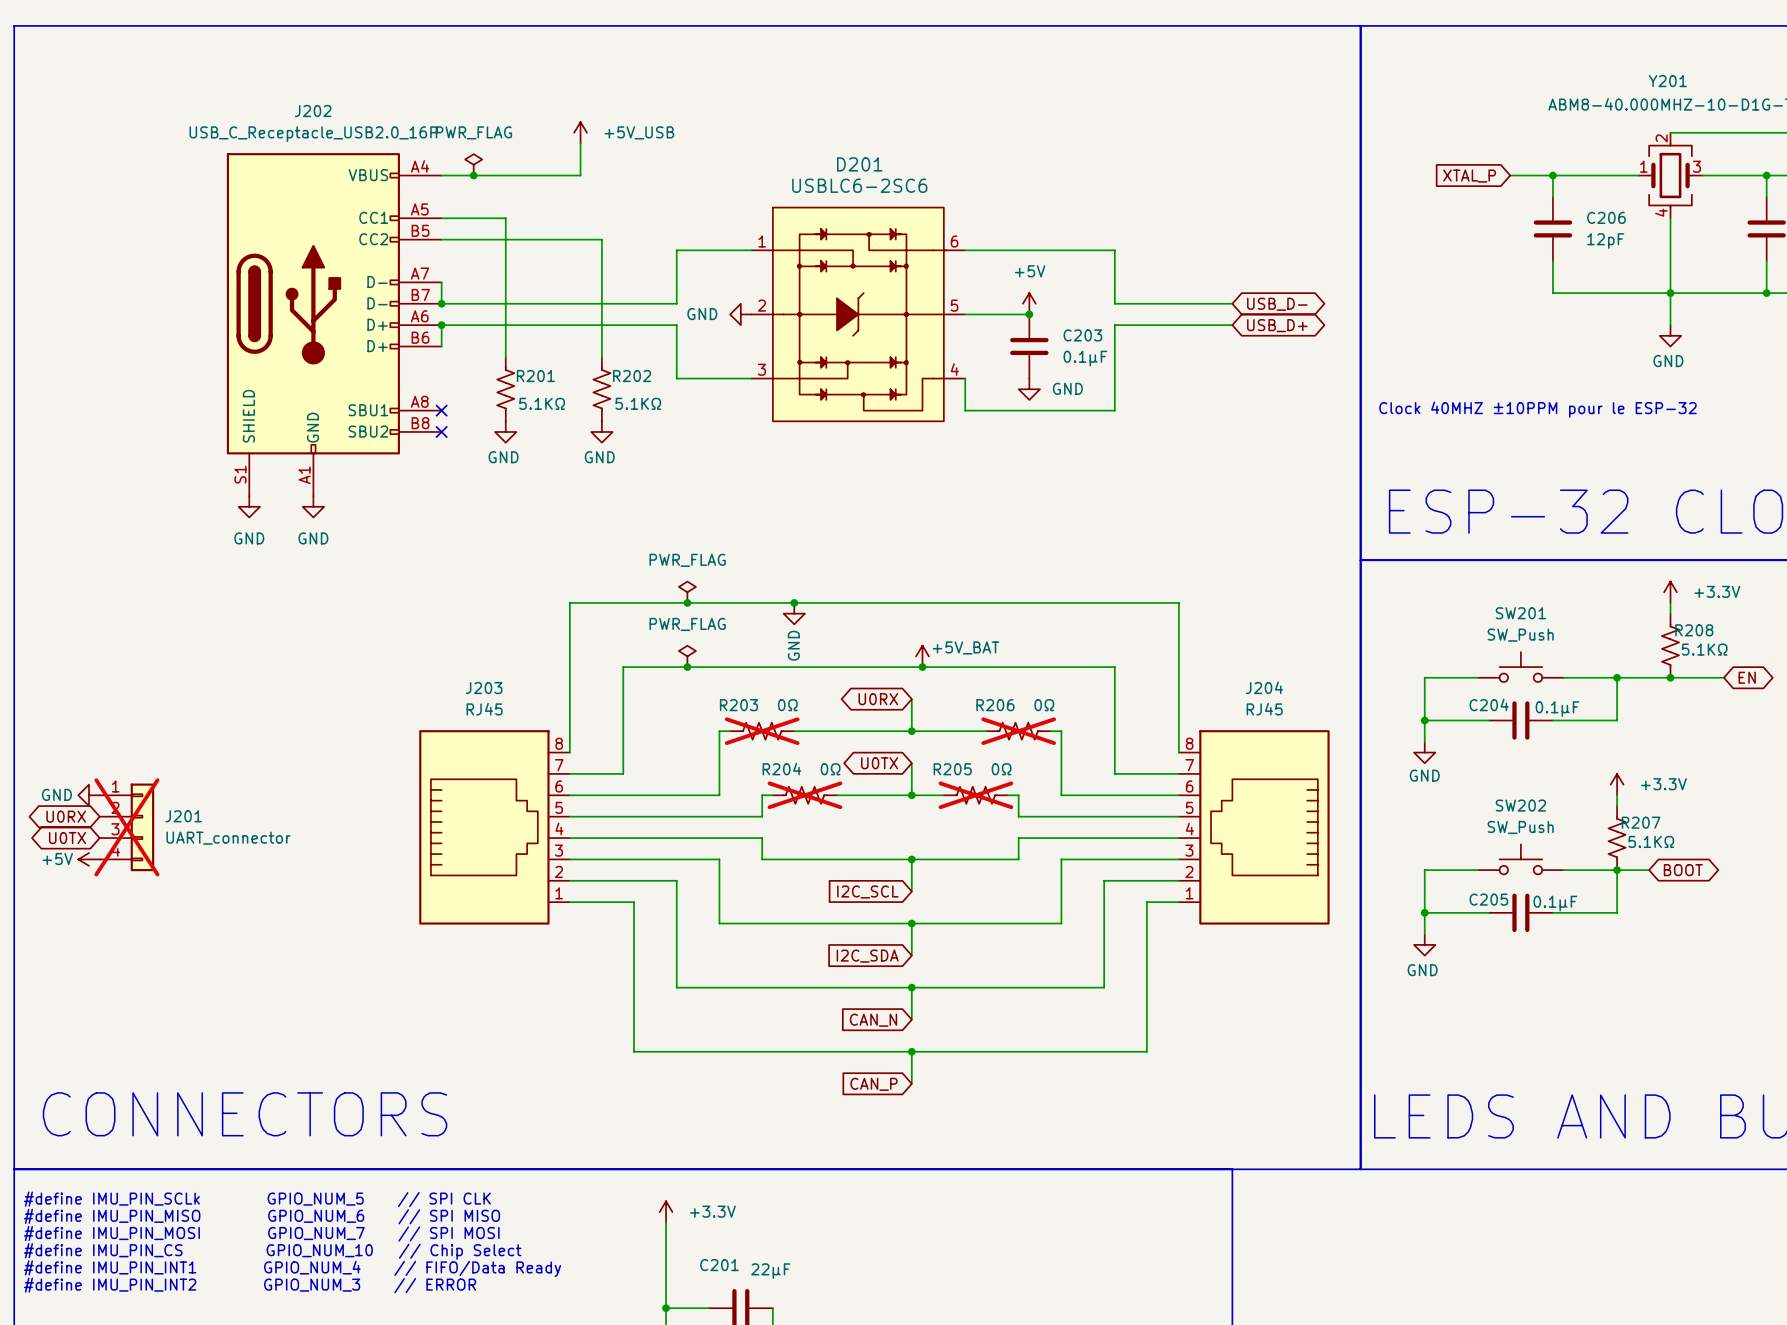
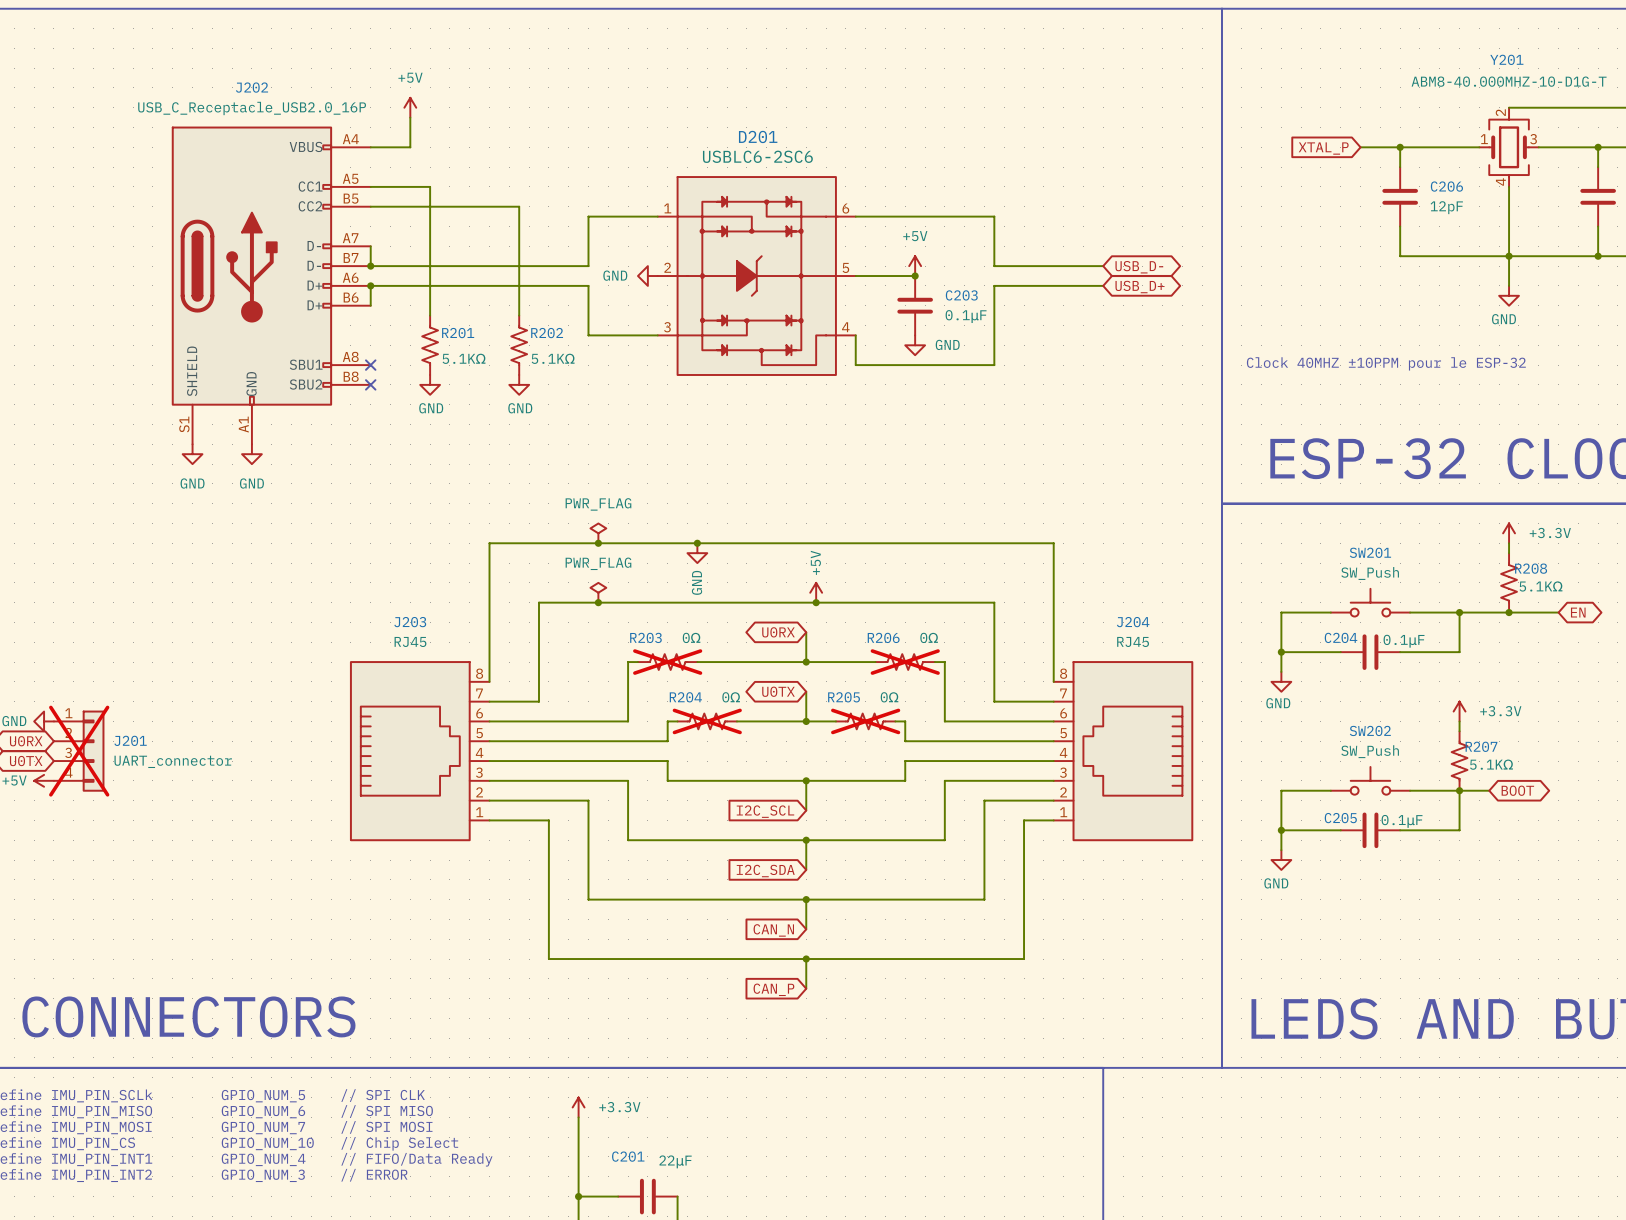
power symbol: none -> +5V (410, 107)
power symbol: +5V_USB (580, 132) -> none
wire: (580, 143) (580, 175) (484, 175) -> (410, 117) (410, 147)
power symbol: PWR_FLAG (473, 164) -> none
junction: (473, 175) -> none
power symbol: +5V_BAT (922, 656) -> +5V (816, 592)

